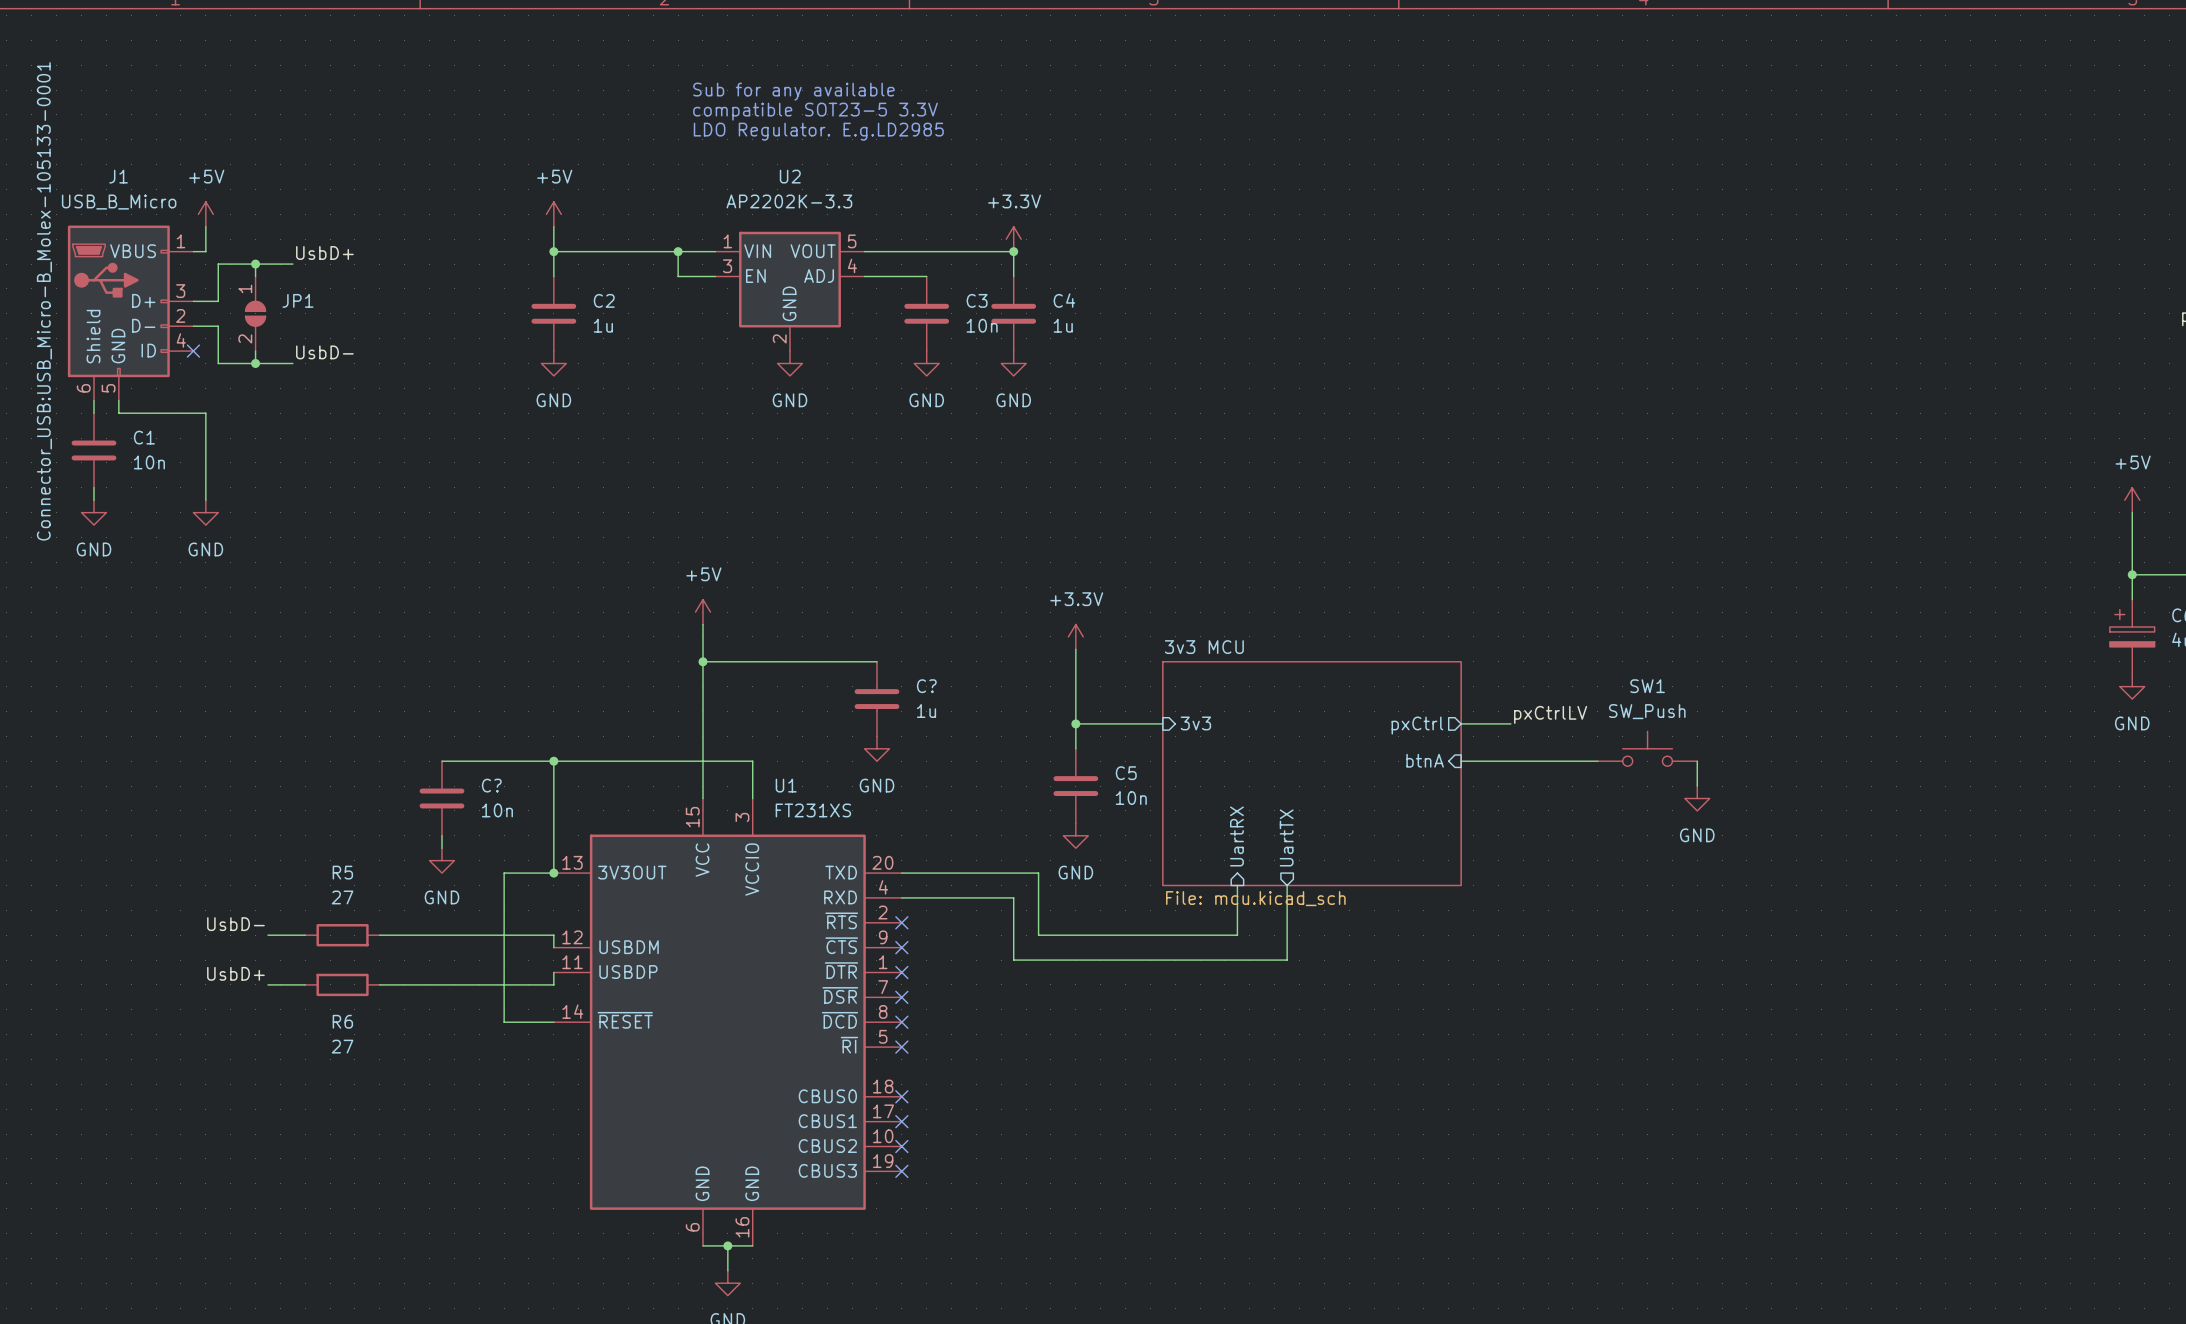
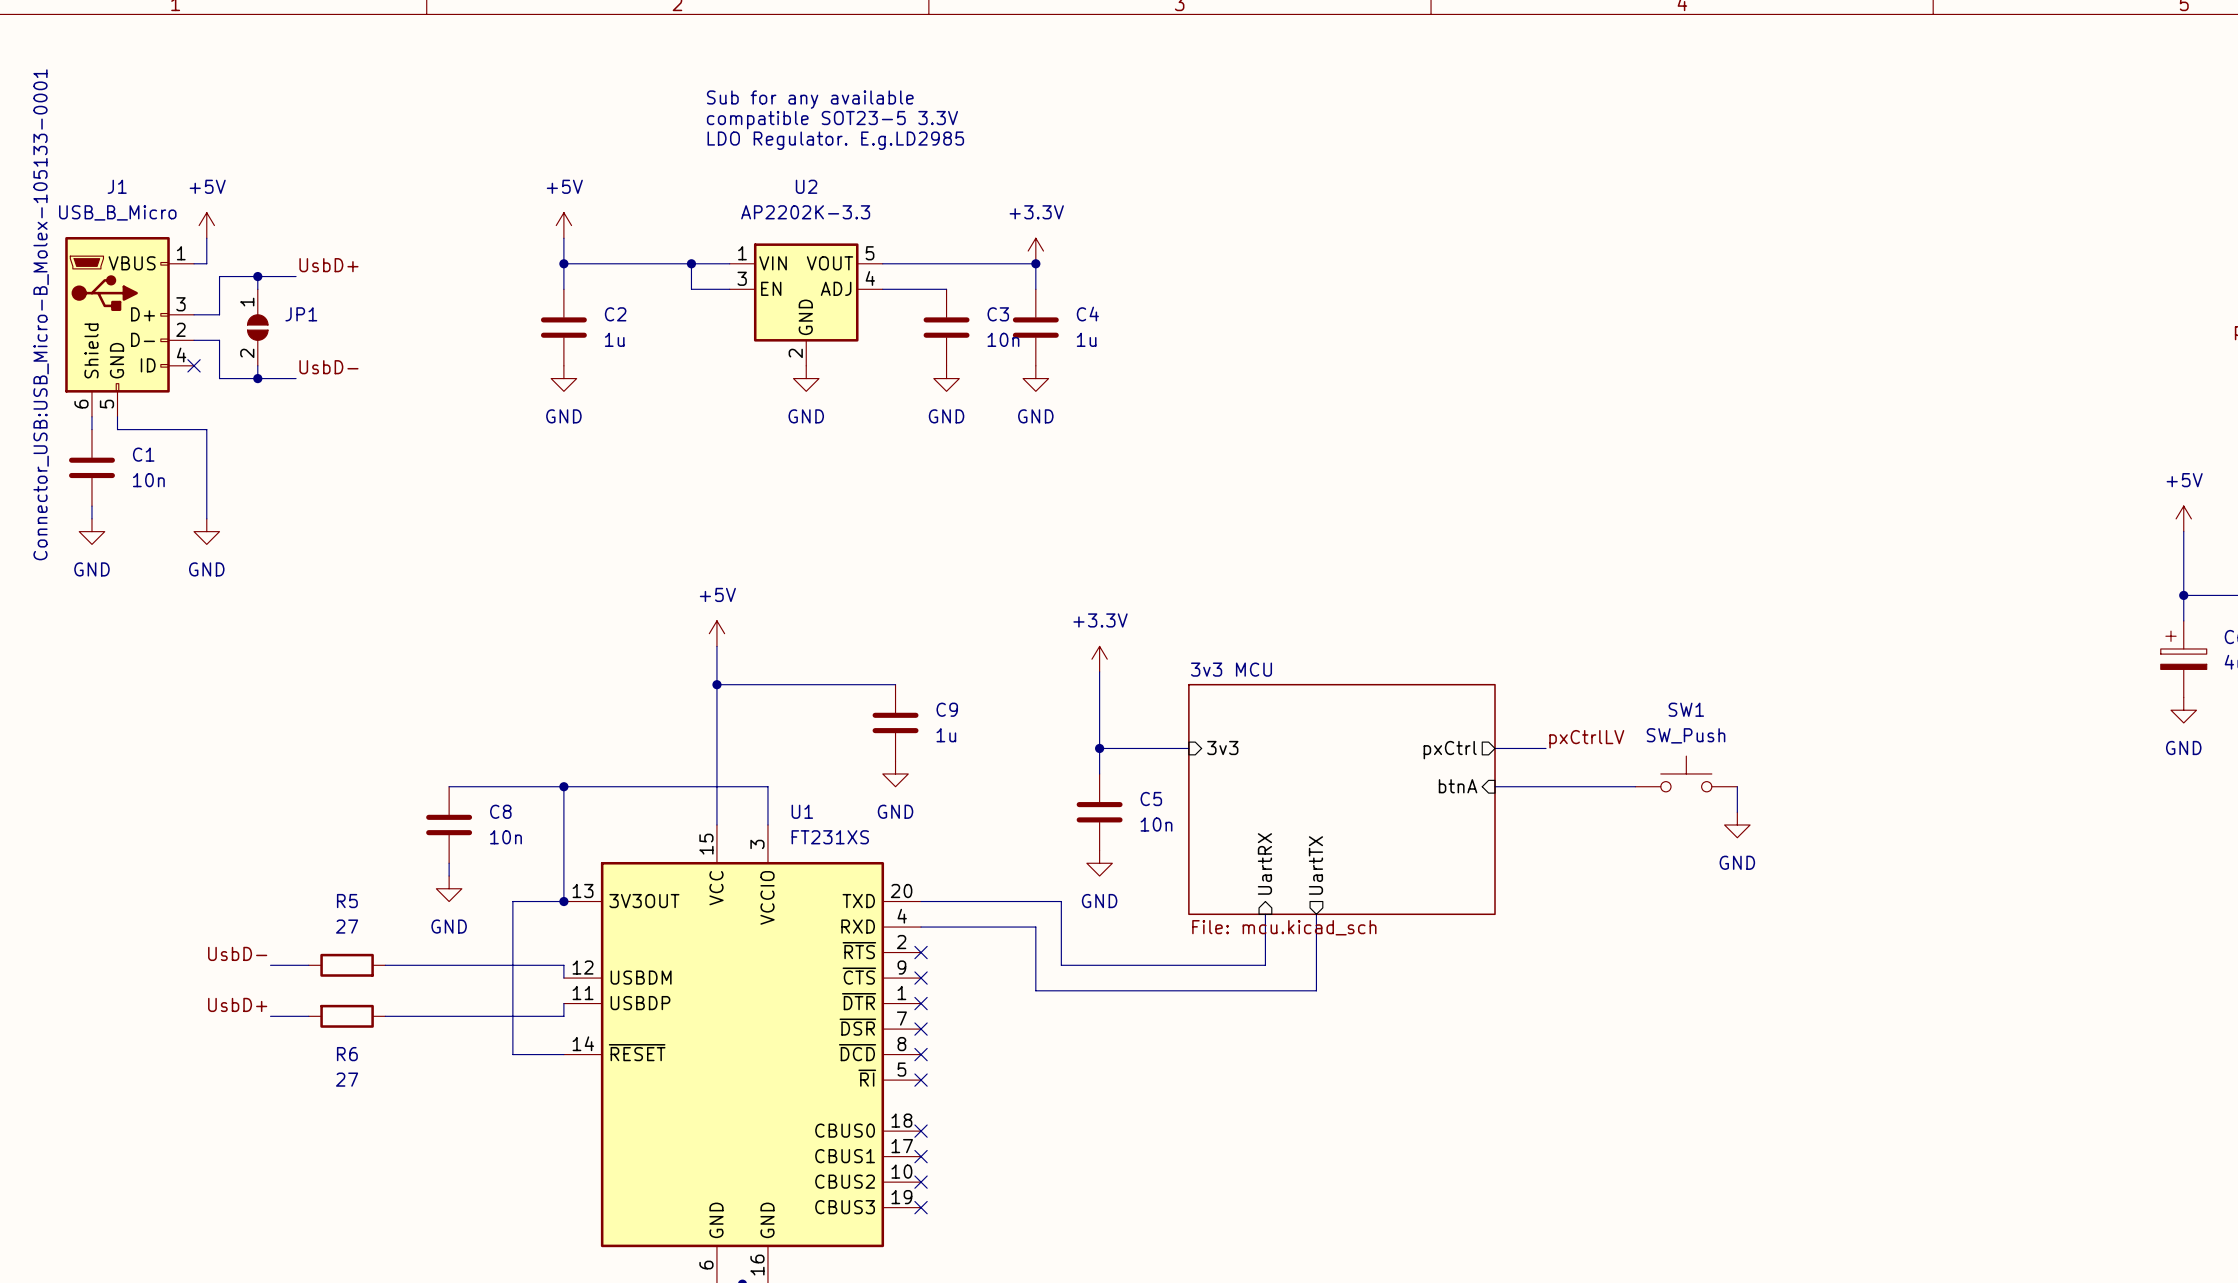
C? name: C? (926, 686) -> C9 (947, 709)
C? name: C? (491, 785) -> C8 (500, 811)

